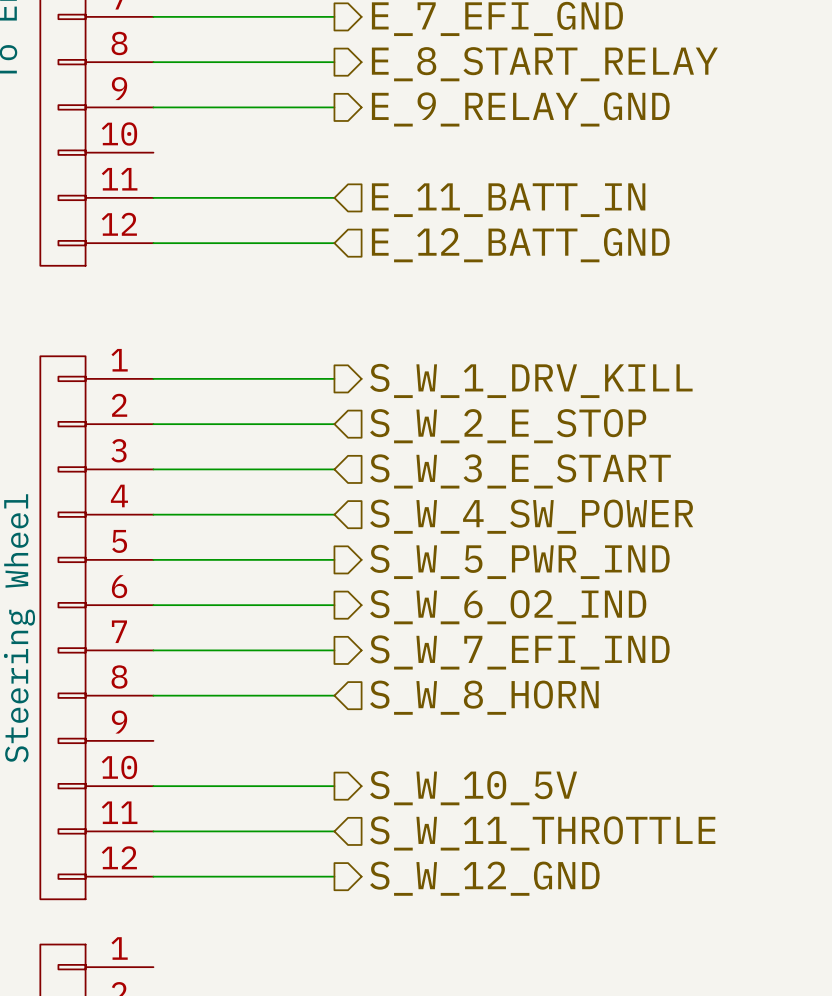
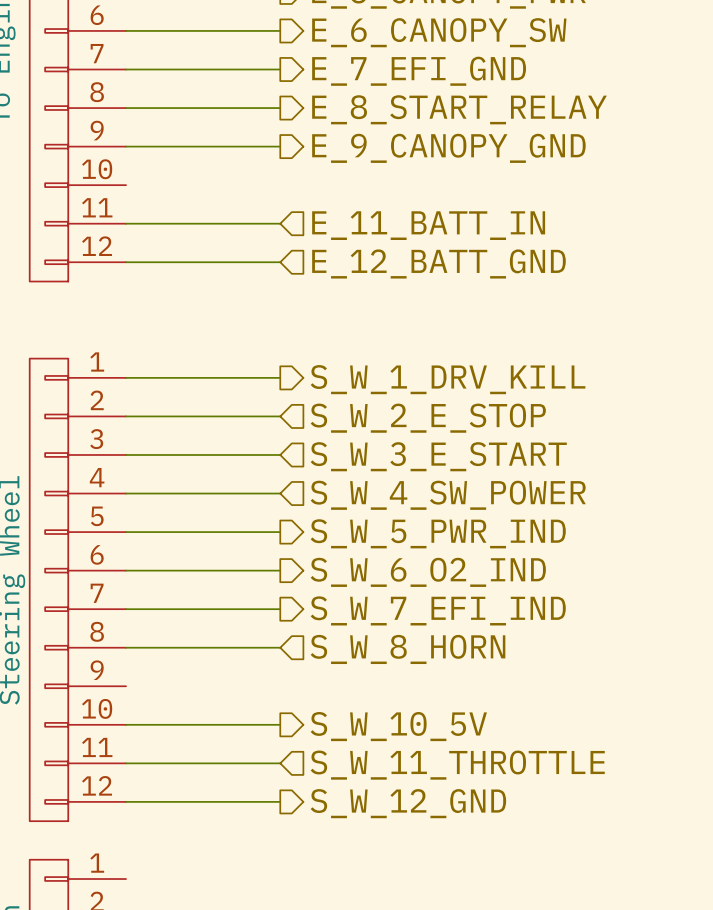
hierarchical label: E_9_RELAY_GND (520, 109) -> E_9_CANOPY_GND (448, 148)

